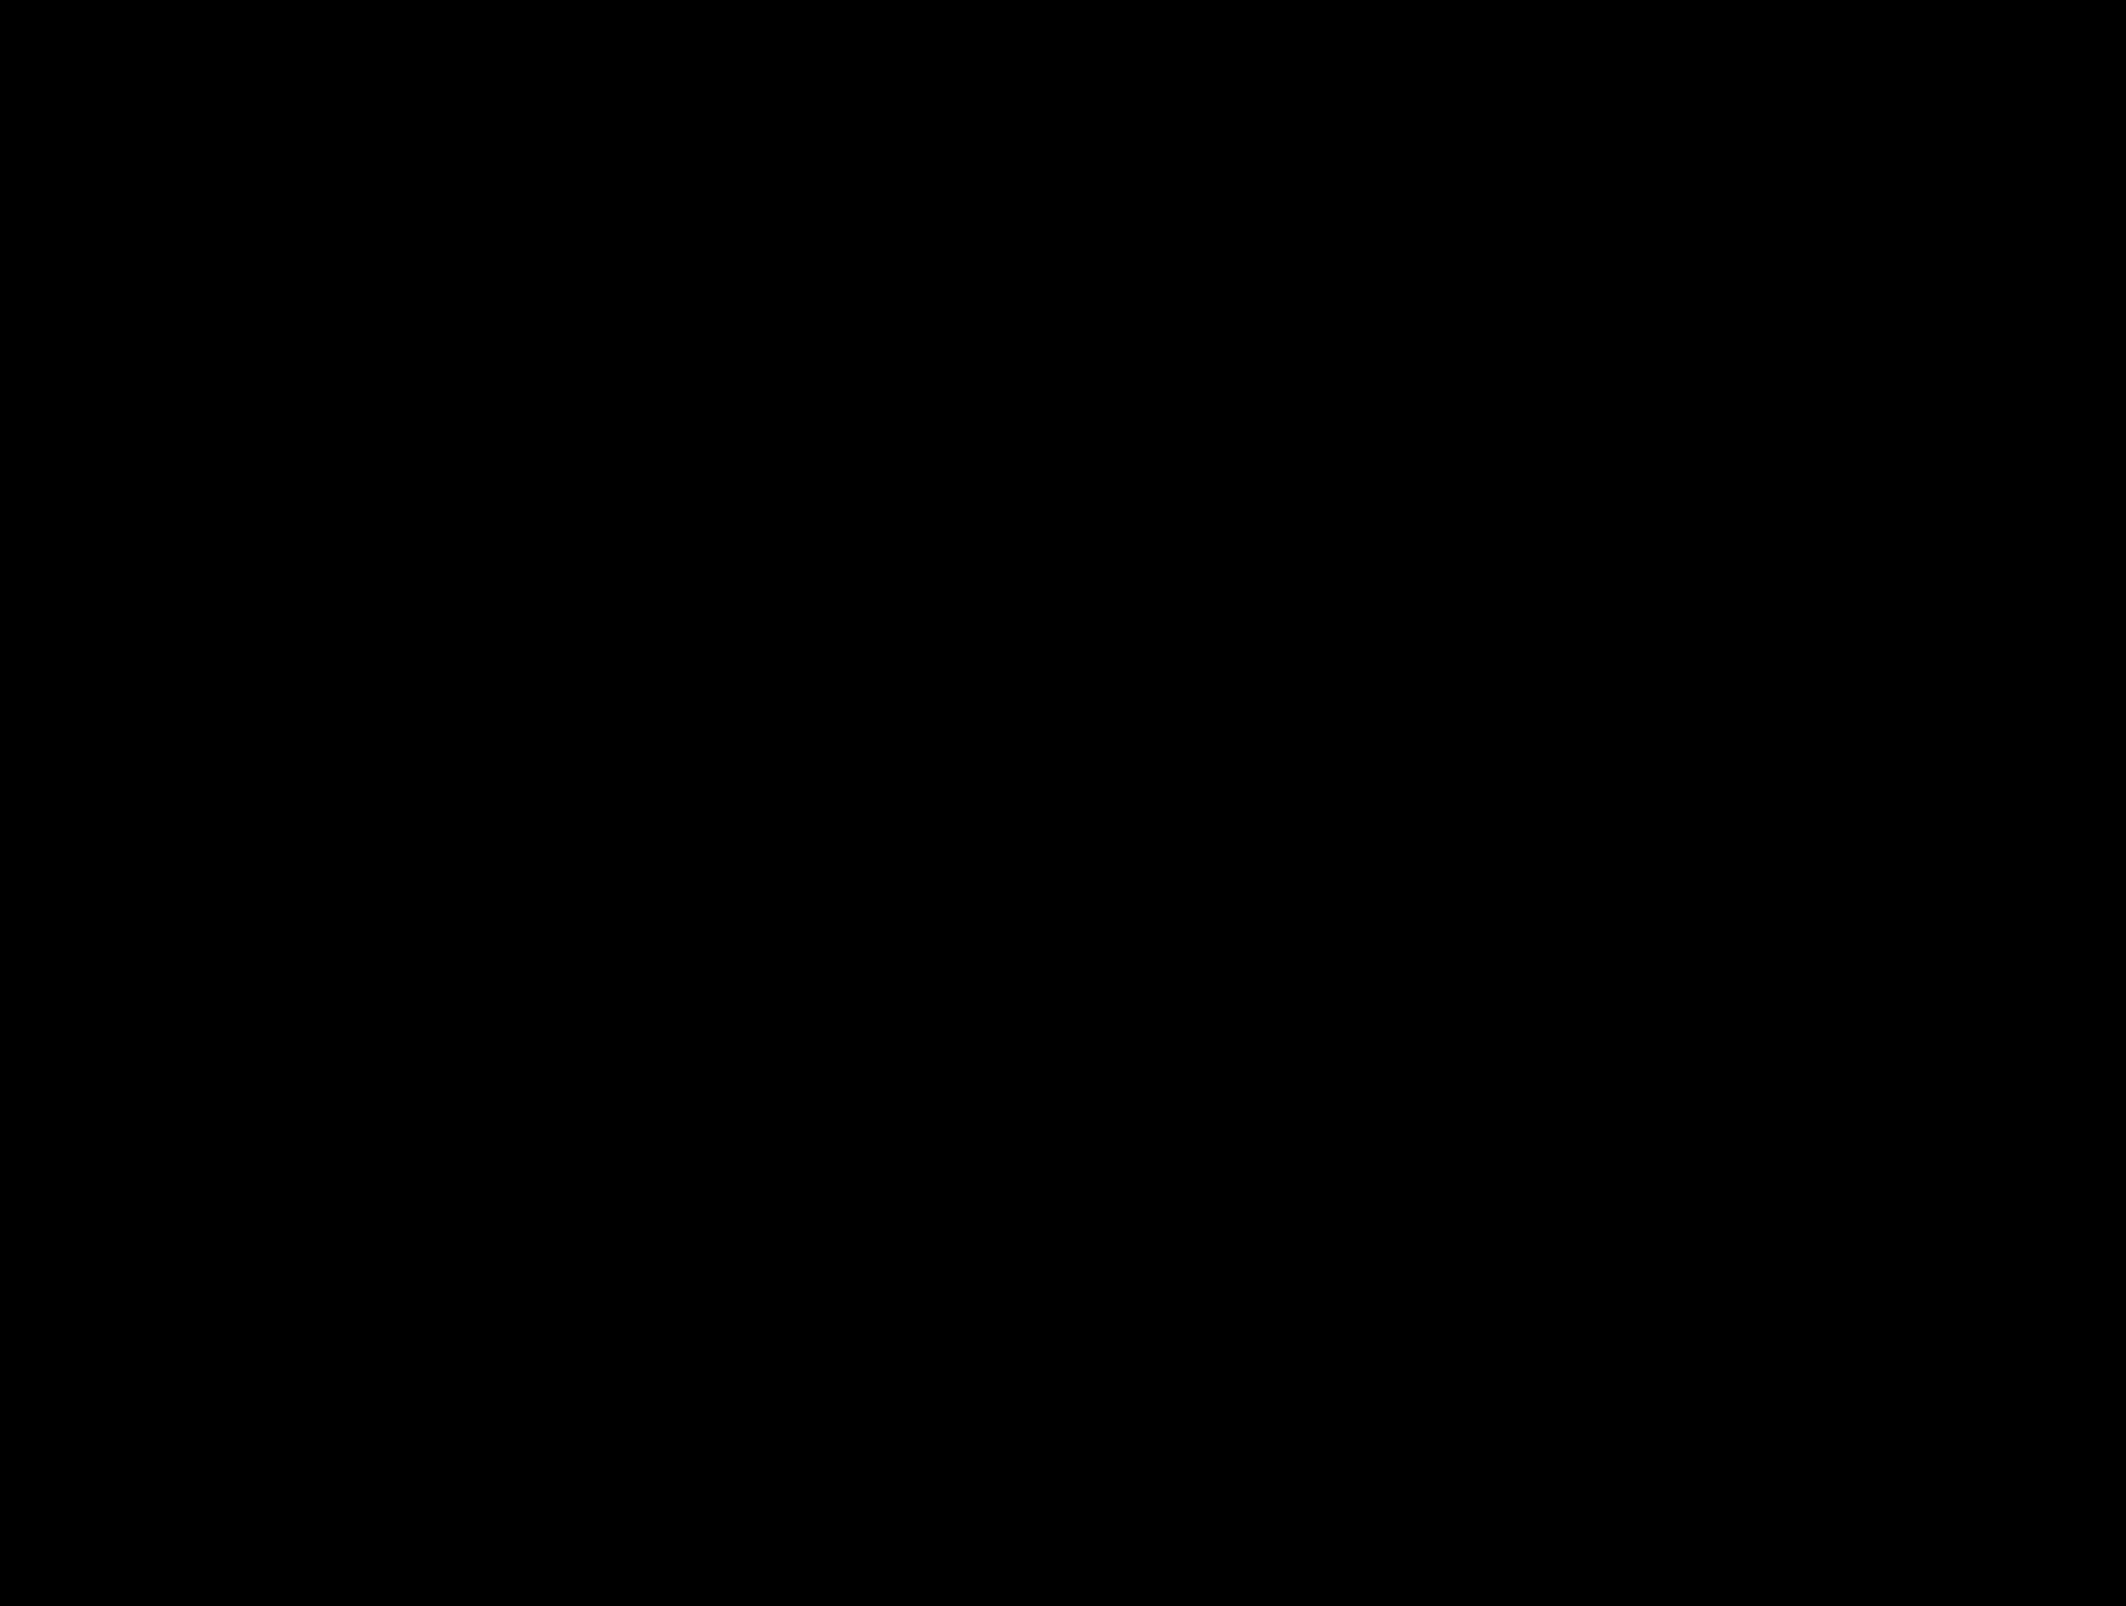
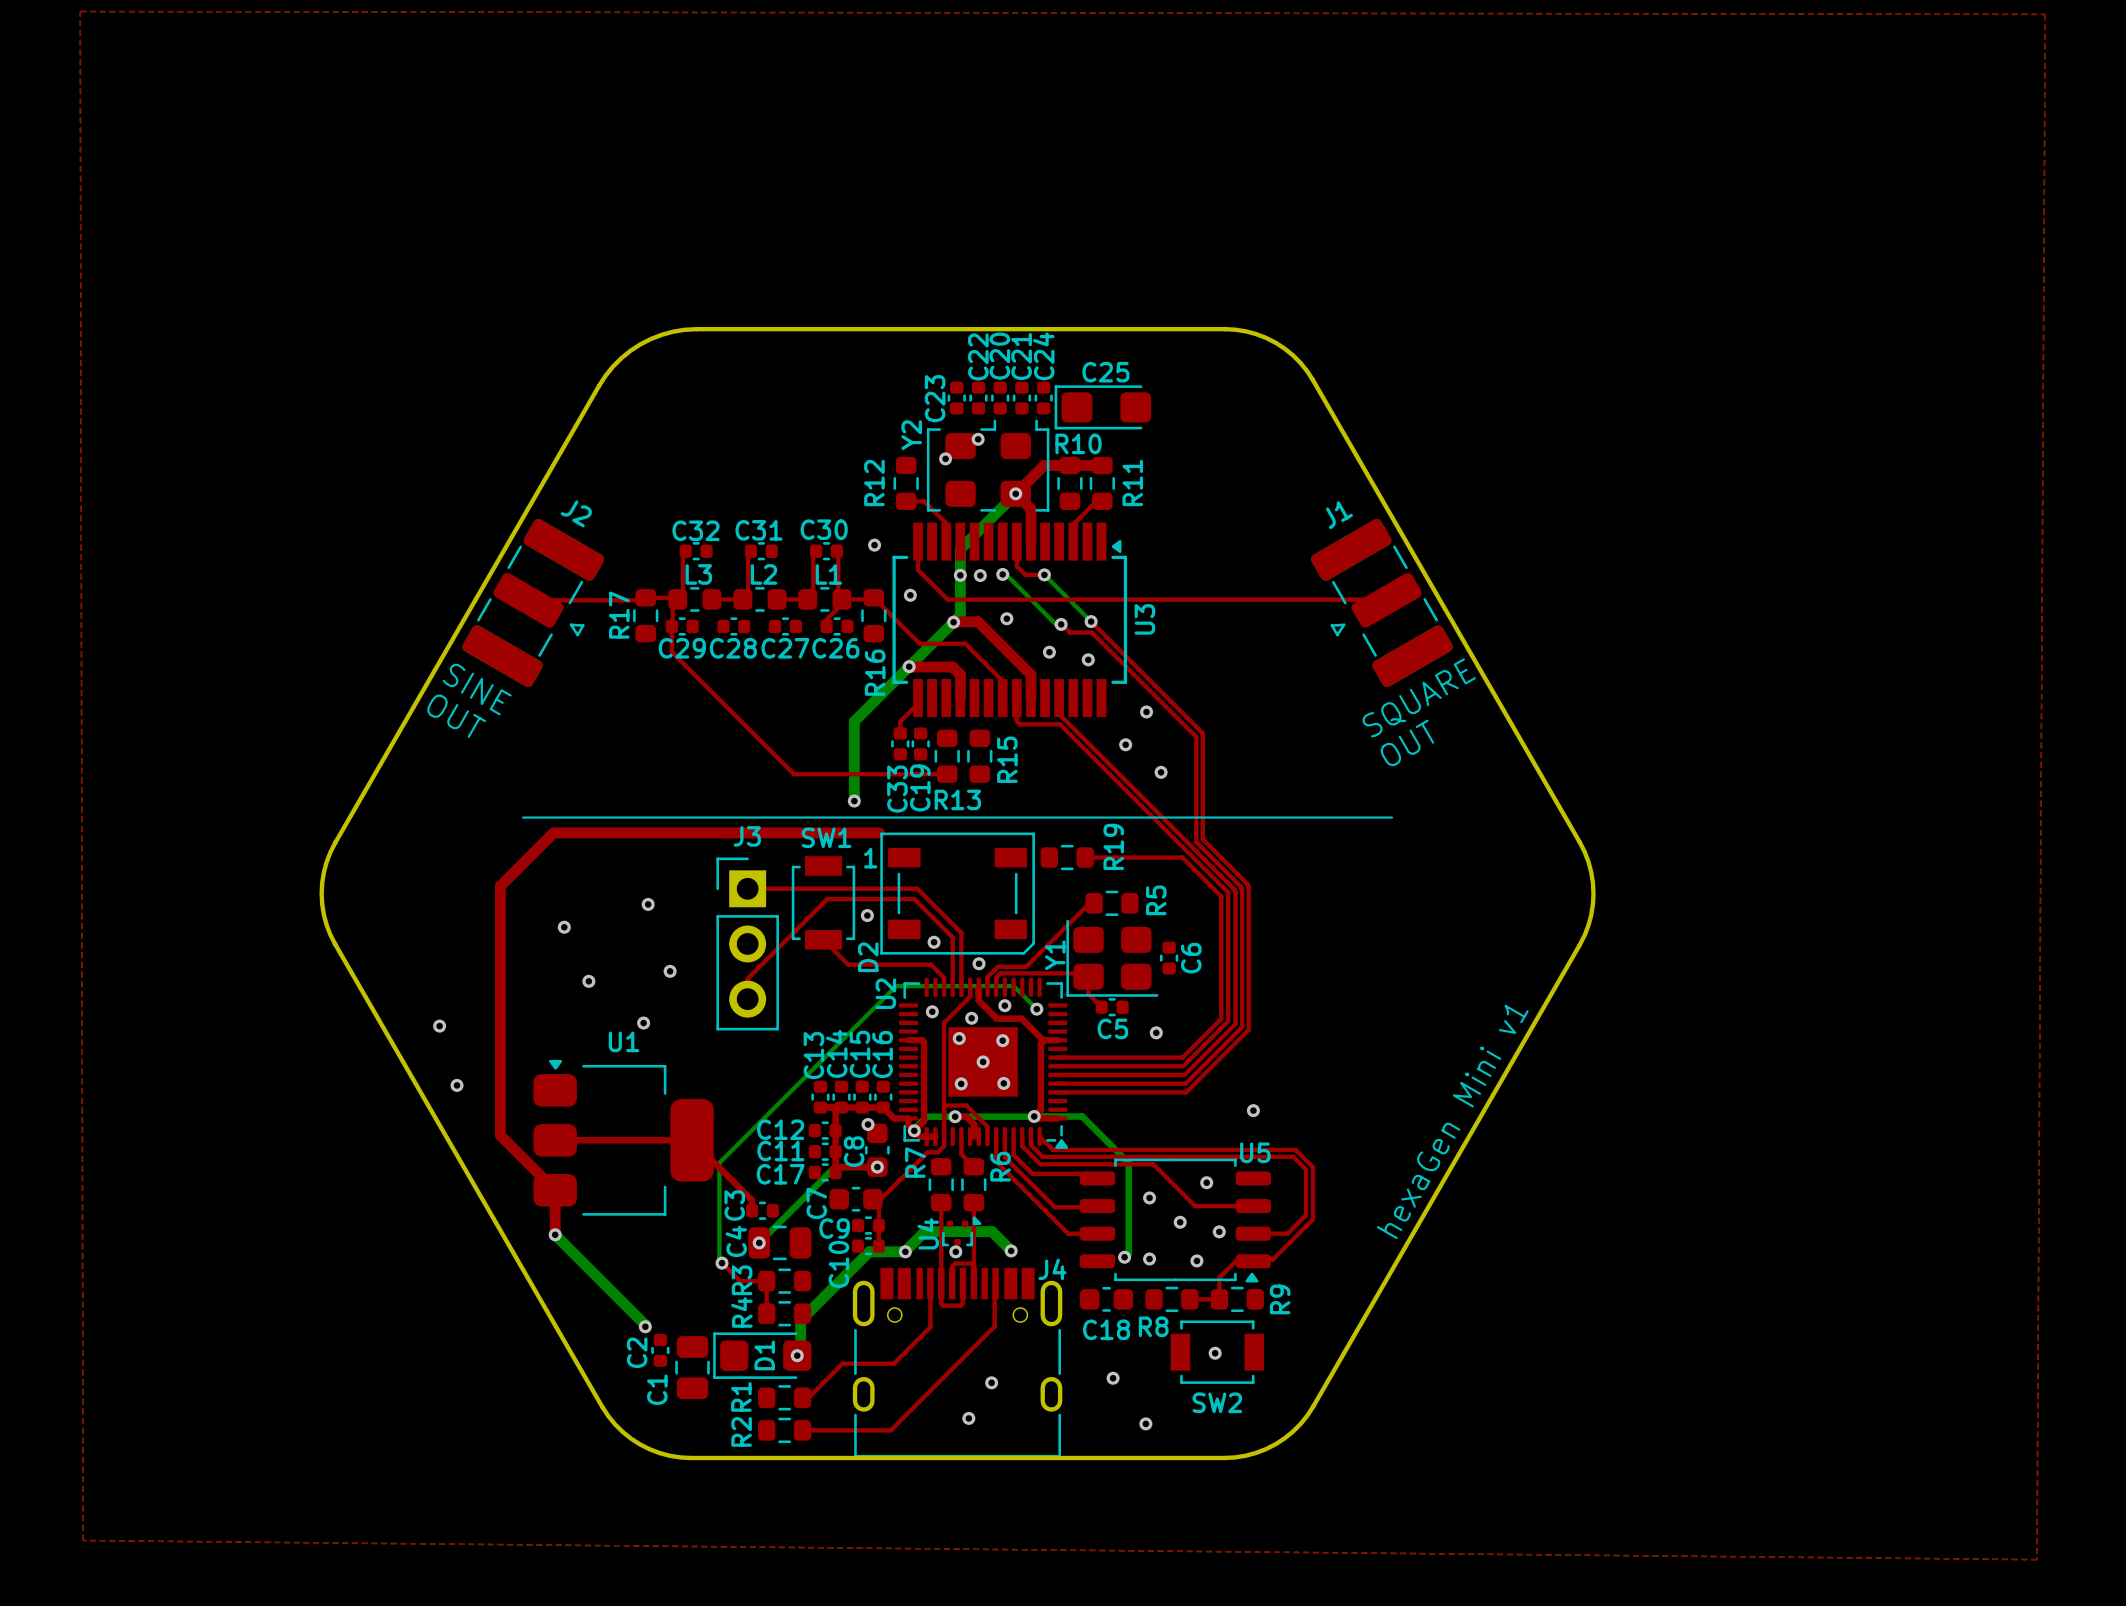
top zone outline: none -> (80, 11) (2045, 14) (2037, 1559) (83, 1540) (80, 11)
board edge: none -> (696, 329) (1224, 329) (1256, 334) (1275, 342) (1292, 355) (1312, 379) (1579, 842) (1591, 872) (1593, 893) (1591, 914) (1584, 935) (1313, 1406) (1293, 1431) (1275, 1444) (1256, 1452) (1224, 1458) (691, 1458) (659, 1453) (639, 1444) (622, 1431) (602, 1406) (335, 944) (323, 914) (321, 893) (323, 872) (330, 852) (599, 385) (621, 358) (640, 344) (673, 331) (696, 329)
C23: none -> (956, 398)
C22: none -> (978, 398)
C20: none -> (1000, 398)
C21: none -> (1021, 398)
C24: none -> (1043, 398)
C25: none -> (1102, 407)
via: none -> (978, 439)
via: none -> (945, 458)
Y2: none -> (988, 465)
top track: none -> (1102, 465) (1044, 465) (1015, 493) (1030, 509) (1030, 541)
R12: none -> (906, 483)
R10: none -> (1069, 483)
R11: none -> (1102, 483)
bottom track: none -> (1015, 493) (960, 549) (960, 615) (854, 721) (854, 801)
via: none -> (1015, 493)
top track: none -> (906, 501) (924, 501) (946, 523) (946, 541)
top track: none -> (1102, 501) (1096, 501) (1073, 524) (1073, 541)
top track: none -> (917, 541) (917, 569) (947, 599) (1386, 600)
top track: none -> (1016, 541) (1016, 566) (1025, 574) (1044, 574)
via: none -> (874, 545)
top track: none -> (685, 551) (682, 554) (682, 594) (672, 604) (671, 651) (794, 774) (947, 774)
C32: none -> (696, 551)
top track: none -> (750, 551) (748, 554) (748, 594) (742, 599) (711, 599)
C31: none -> (761, 551)
top track: none -> (816, 551) (813, 554) (813, 593) (807, 599) (777, 599)
C30: none -> (826, 551)
top track: none -> (836, 551) (838, 595) (842, 599)
bottom track: none -> (1002, 574) (1005, 574) (1055, 624) (1061, 624)
via: none -> (1002, 574)
bottom track: none -> (1044, 574) (1091, 621)
via: none -> (1044, 574)
via: none -> (960, 575)
via: none -> (980, 575)
via: none -> (910, 595)
top track: none -> (677, 599) (676, 597) (645, 597) (643, 600) (528, 600)
L3: none -> (694, 599)
L2: none -> (759, 599)
L1: none -> (824, 599)
top track: none -> (842, 599) (872, 599) (873, 597) (919, 643) (965, 643) (1002, 681) (1002, 698)
top track: none -> (842, 599) (842, 604) (826, 619) (826, 626)
J2: none -> (533, 603)
J1: none -> (1381, 603)
R17: none -> (645, 615)
R16: none -> (873, 615)
via: none -> (1006, 618)
U3: none -> (1009, 619)
top track: none -> (1091, 621) (1202, 732) (1202, 839) (1248, 886) (1248, 1029) (1186, 1092) (1057, 1092)
via: none -> (1091, 621)
top track: none -> (953, 622) (978, 621) (1030, 674) (1030, 698)
via: none -> (953, 622)
top track: none -> (1061, 624) (1069, 632) (1091, 632) (1196, 736) (1196, 842) (1242, 889) (1242, 1026) (1185, 1083) (1057, 1083)
via: none -> (1061, 624)
C29: none -> (682, 626)
C28: none -> (733, 626)
C27: none -> (785, 626)
C26: none -> (837, 626)
via: none -> (1049, 652)
via: none -> (1088, 659)
top track: none -> (909, 666) (952, 666) (960, 674) (960, 698)
via: none -> (909, 666)
text: none -> SINE (477, 689)
text: none -> SQUARE (1419, 697)
top track: none -> (917, 698) (917, 703) (900, 721) (900, 733)
top track: none -> (1016, 698) (1016, 721) (1019, 724) (1060, 724) (1228, 892) (1228, 1021) (1183, 1066) (1057, 1066)
top track: none -> (1059, 698) (1059, 714) (1234, 889) (1235, 1023) (1184, 1074) (1057, 1074)
via: none -> (1146, 711)
text: none -> OUT (456, 716)
text: none -> OUT (1407, 742)
C33: none -> (900, 743)
C19: none -> (920, 743)
via: none -> (1125, 744)
R13: none -> (947, 756)
R15: none -> (979, 756)
via: none -> (1161, 772)
via: none -> (854, 801)
line: none -> (523, 817) (1392, 817)
top track: none -> (879, 832) (553, 832) (500, 886) (500, 1135) (555, 1190) (555, 1234)
R19: none -> (1067, 857)
top track: none -> (1085, 857) (1182, 857) (1221, 896) (1221, 1018) (1182, 1057) (1057, 1057)
top track: none -> (747, 888) (917, 888) (961, 932) (961, 987)
D2: none -> (957, 893)
SW1: none -> (823, 902)
top track: none -> (1094, 903) (1089, 903) (1026, 966) (997, 966) (987, 977) (987, 987)
R5: none -> (1111, 903)
via: none -> (648, 904)
via: none -> (867, 915)
via: none -> (564, 927)
top track: none -> (823, 939) (848, 964) (930, 964) (944, 977) (944, 987)
via: none -> (934, 942)
J3: none -> (747, 943)
Y1: none -> (1112, 958)
C6: none -> (1169, 958)
via: none -> (979, 963)
via: none -> (670, 971)
via: none -> (588, 981)
top track: none -> (952, 987) (952, 937) (914, 899) (827, 899) (747, 978) (747, 999)
top track: none -> (970, 987) (970, 996) (944, 1022) (944, 1146) (937, 1152) (927, 1152) (880, 1199) (872, 1199) (878, 1205) (878, 1246)
top track: none -> (978, 987) (978, 1000) (996, 1018) (1021, 1018) (1043, 1040)
top track: none -> (996, 987) (996, 977) (1000, 973) (1085, 973) (1088, 976) (1088, 993) (1101, 1007)
via: none -> (1004, 1005)
C5: none -> (1112, 1007)
bottom track: none -> (1036, 1009) (1013, 986) (896, 986) (719, 1162) (719, 1260) (722, 1263)
via: none -> (1036, 1009)
via: none -> (932, 1011)
via: none -> (971, 1018)
via: none -> (643, 1023)
via: none -> (439, 1026)
via: none -> (1156, 1032)
via: none -> (959, 1038)
top track: none -> (908, 1040) (922, 1040) (924, 1041) (924, 1121) (914, 1130)
via: none -> (1002, 1040)
top track: none -> (1057, 1040) (1044, 1040) (1040, 1043) (1040, 1109) (1034, 1116) (1036, 1118) (1057, 1118)
via: none -> (983, 1061)
U2: none -> (983, 1063)
via: none -> (961, 1083)
via: none -> (1003, 1083)
via: none -> (456, 1085)
C13: none -> (820, 1097)
C14: none -> (841, 1097)
C15: none -> (862, 1097)
C16: none -> (883, 1097)
top track: none -> (944, 1105) (966, 1105) (987, 1126) (987, 1136)
top track: none -> (820, 1107) (883, 1107) (894, 1118) (908, 1118) (908, 1125) (920, 1136) (935, 1136)
top track: none -> (835, 1107) (835, 1172) (840, 1167) (877, 1167)
via: none -> (1253, 1110)
top track: none -> (955, 1116) (966, 1116) (974, 1124) (974, 1136)
via: none -> (955, 1116)
bottom track: none -> (1033, 1116) (926, 1116) (914, 1130)
bottom track: none -> (1034, 1116) (1082, 1116) (1128, 1162) (1128, 1253) (1124, 1257)
via: none -> (1034, 1116)
text: none -> hexaGen Mini v1 (1452, 1121)
via: none -> (868, 1124)
C12: none -> (825, 1130)
via: none -> (914, 1130)
top track: none -> (961, 1136) (961, 1154) (973, 1166)
top track: none -> (996, 1136) (996, 1161) (1068, 1233) (1097, 1233)
top track: none -> (1004, 1136) (1004, 1157) (1054, 1207) (1097, 1206)
top track: none -> (1013, 1136) (1013, 1154) (1032, 1173) (1092, 1173) (1097, 1178)
top track: none -> (1022, 1136) (1022, 1146) (1040, 1164) (1153, 1164) (1195, 1206) (1253, 1206)
top track: none -> (1030, 1136) (1030, 1145) (1042, 1156) (1293, 1156) (1305, 1169) (1305, 1215) (1287, 1233) (1253, 1233)
top track: none -> (1039, 1136) (1052, 1149) (1294, 1149) (1312, 1167) (1312, 1219) (1272, 1259) (1235, 1261) (1219, 1277) (1219, 1299) (1189, 1299)
U1: none -> (623, 1137)
top track: none -> (555, 1140) (692, 1140)
top track: none -> (692, 1140) (752, 1200) (752, 1210)
C8: none -> (877, 1150)
C11: none -> (825, 1151)
bottom track: none -> (877, 1167) (835, 1167) (759, 1242)
via: none -> (877, 1167)
C17: none -> (825, 1172)
via: none -> (1206, 1182)
R7: none -> (941, 1184)
R6: none -> (973, 1184)
via: none -> (1149, 1197)
C7: none -> (856, 1199)
top track: none -> (941, 1202) (941, 1303) (943, 1305) (960, 1305) (963, 1303) (963, 1283)
top track: none -> (973, 1202) (973, 1283)
C3: none -> (762, 1210)
U5: none -> (1175, 1220)
via: none -> (1180, 1222)
C9: none -> (868, 1225)
U4: none -> (961, 1231)
via: none -> (1219, 1231)
bottom track: none -> (555, 1234) (645, 1326)
via: none -> (555, 1234)
via: none -> (759, 1242)
C4: none -> (779, 1242)
C10: none -> (868, 1246)
bottom track: none -> (1011, 1250) (992, 1231) (924, 1231) (905, 1251) (869, 1251) (800, 1320) (800, 1352) (798, 1356)
via: none -> (1011, 1250)
via: none -> (905, 1251)
via: none -> (955, 1251)
via: none -> (1124, 1257)
via: none -> (1149, 1258)
via: none -> (1196, 1260)
top track: none -> (722, 1263) (740, 1281) (766, 1281) (766, 1313)
via: none -> (722, 1263)
top track: none -> (973, 1265) (971, 1263) (955, 1263) (952, 1266) (952, 1283)
R4: none -> (784, 1281)
top track: none -> (930, 1283) (930, 1327) (893, 1363) (842, 1363) (808, 1397) (802, 1397)
top track: none -> (995, 1283) (994, 1326) (890, 1430) (802, 1430)
C18: none -> (1106, 1299)
R8: none -> (1171, 1299)
R9: none -> (1237, 1299)
R3: none -> (784, 1313)
via: none -> (645, 1326)
C2: none -> (660, 1350)
SW2: none -> (1217, 1352)
via: none -> (1215, 1353)
D1: none -> (762, 1355)
via: none -> (797, 1355)
J4: none -> (957, 1362)
C1: none -> (692, 1367)
via: none -> (1113, 1378)
via: none -> (991, 1382)
R1: none -> (784, 1397)
via: none -> (968, 1418)
via: none -> (1145, 1423)
R2: none -> (784, 1430)

